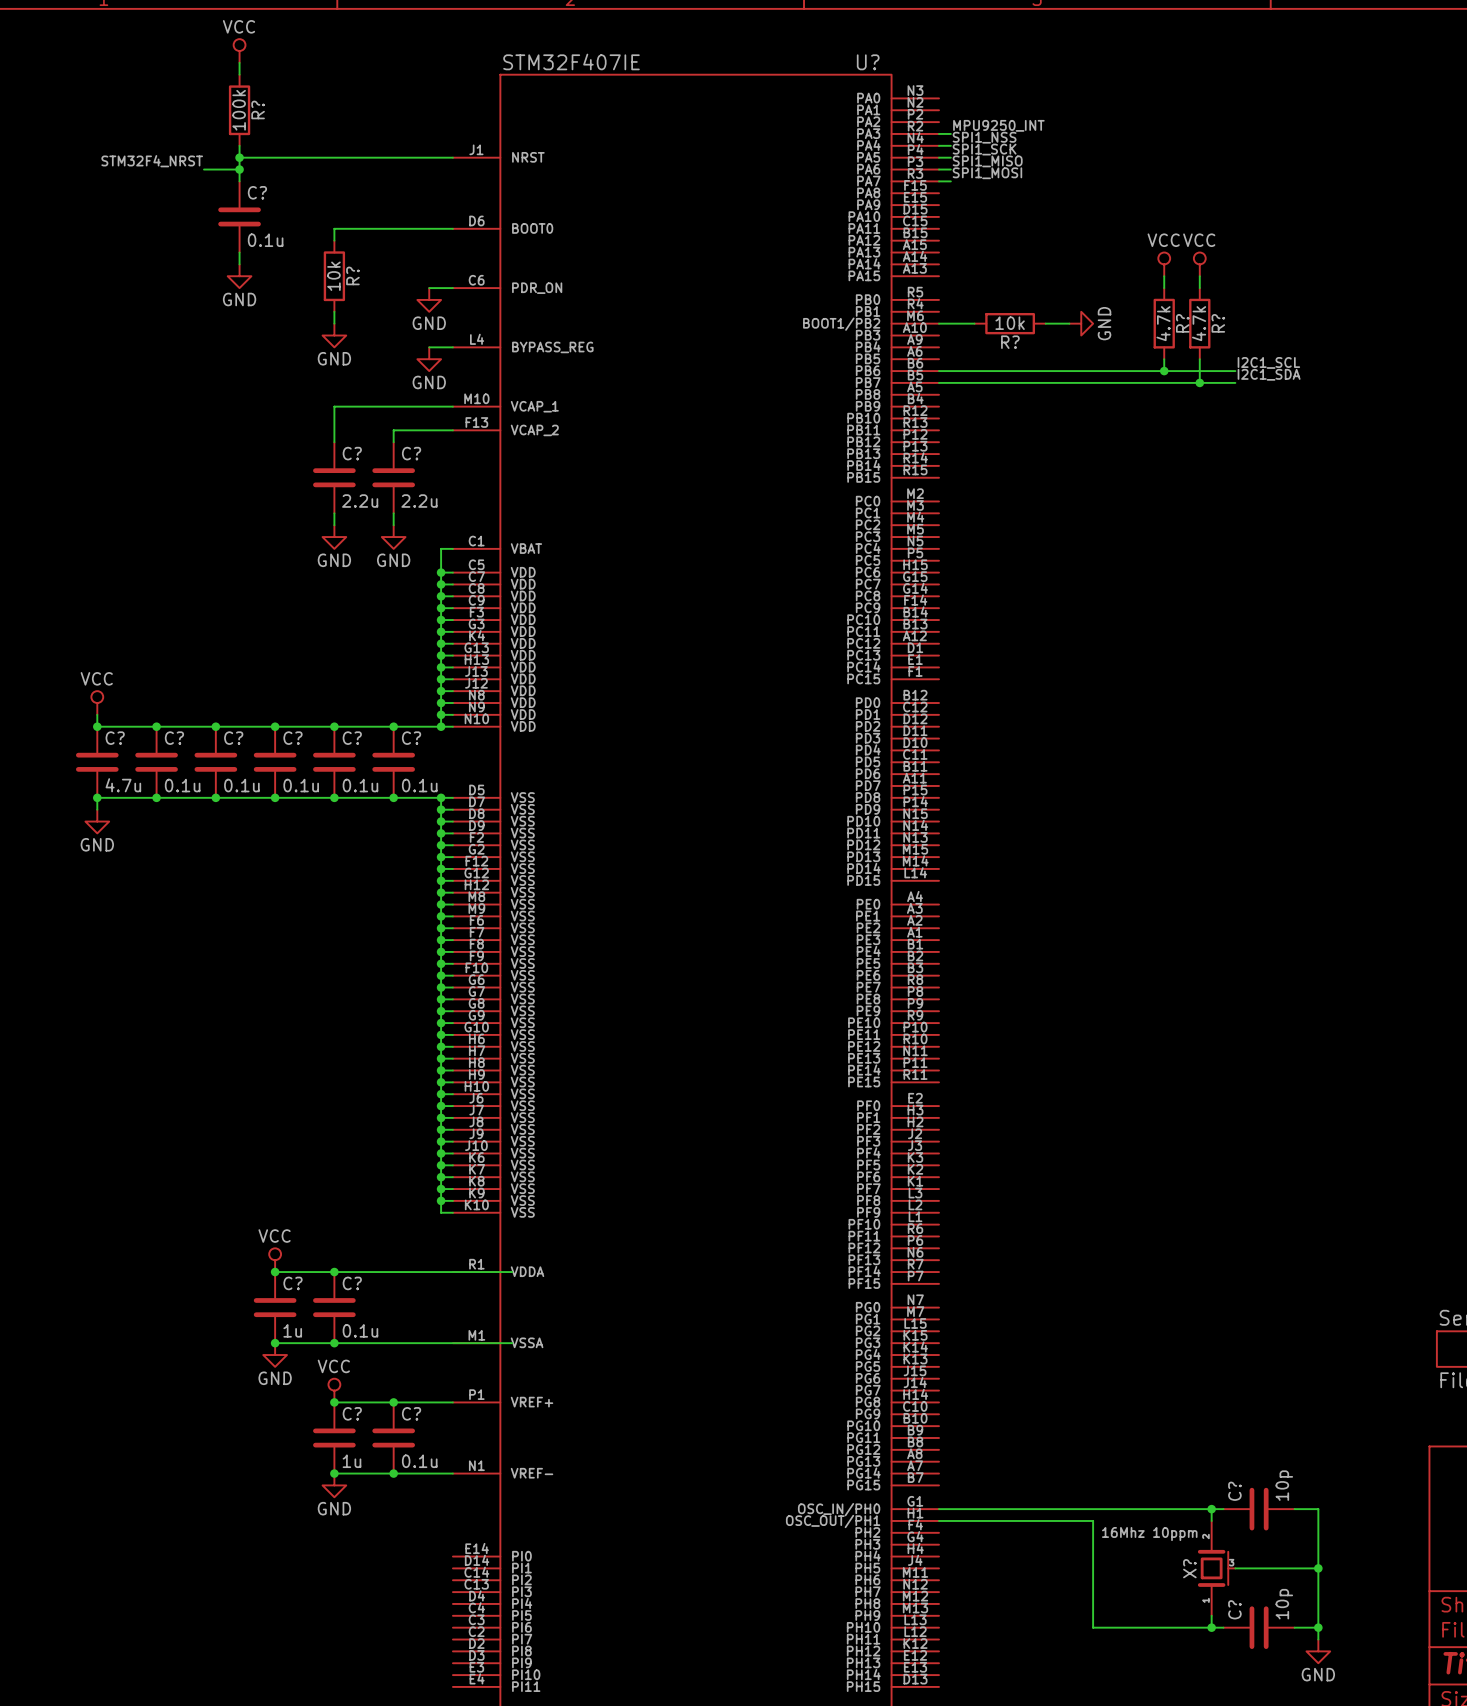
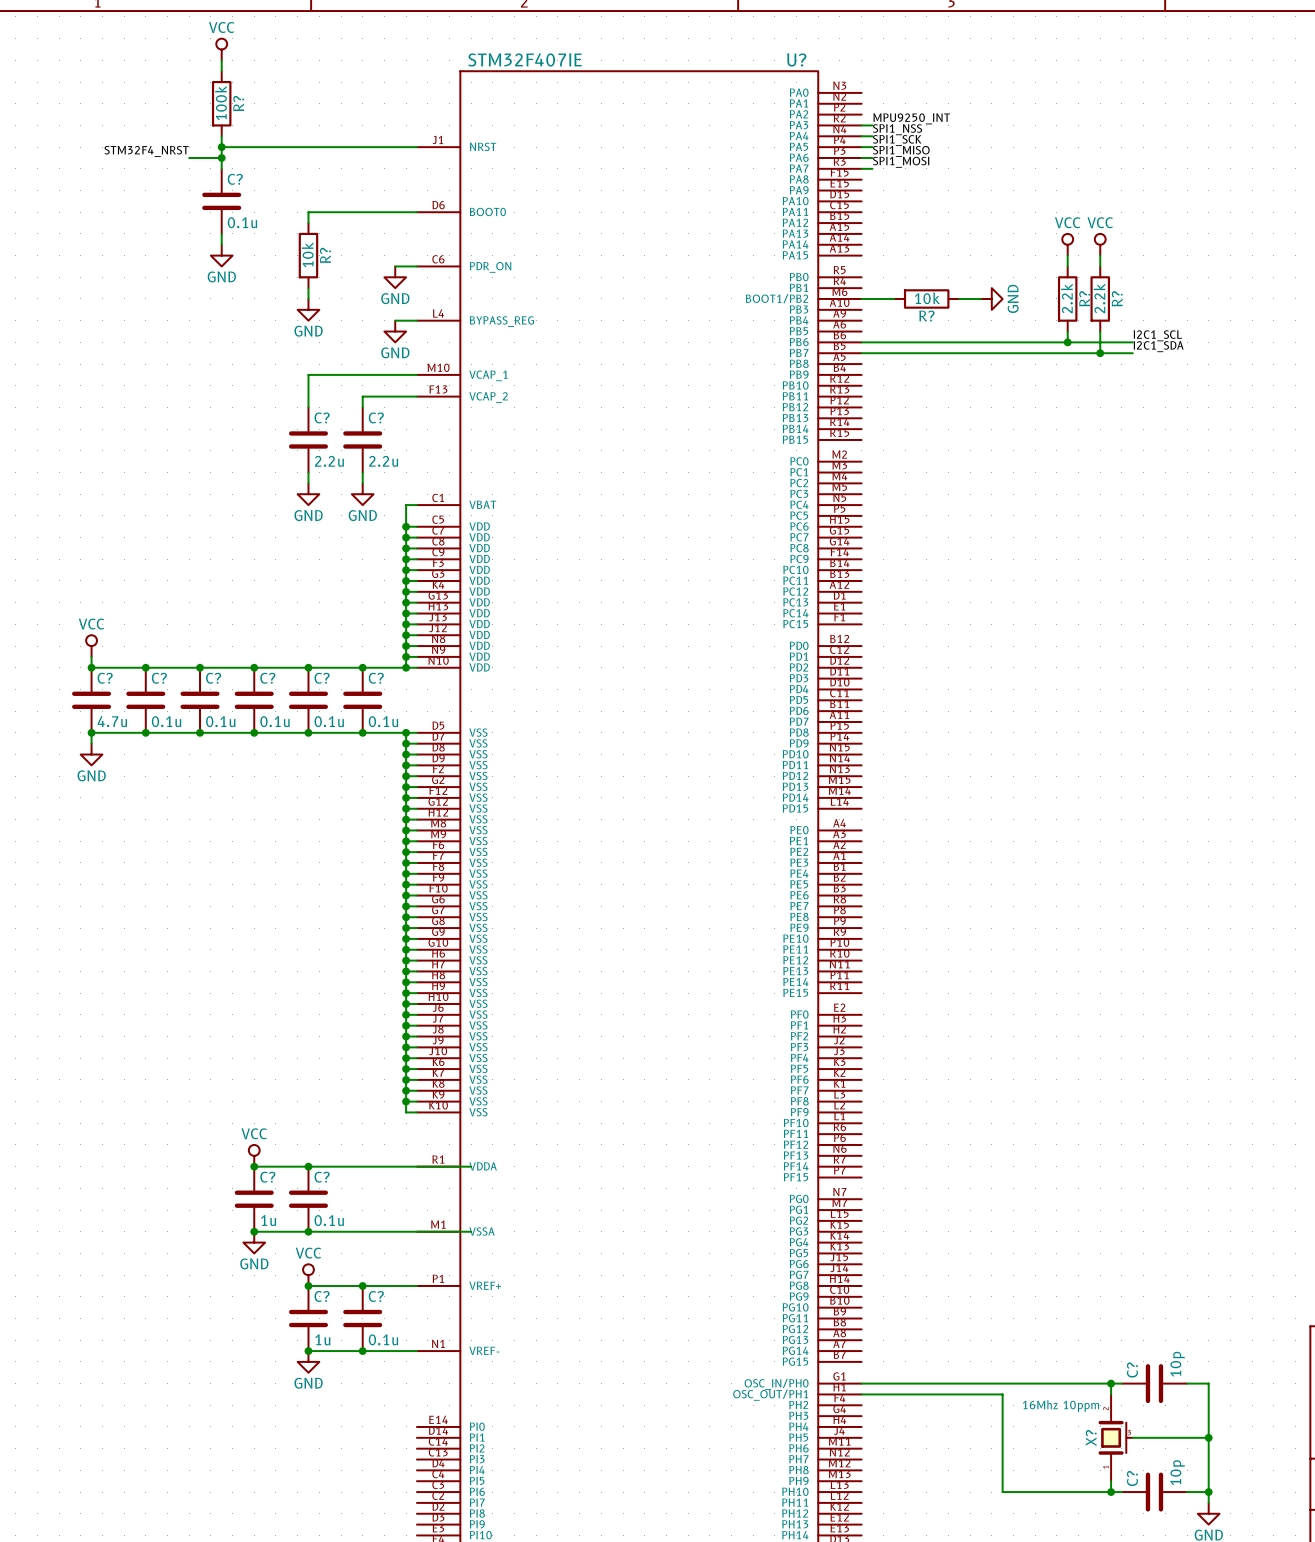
R? value: 4.7k (1163, 323) -> 2.2k (1067, 298)
R? value: 4.7k (1199, 323) -> 2.2k (1099, 298)

